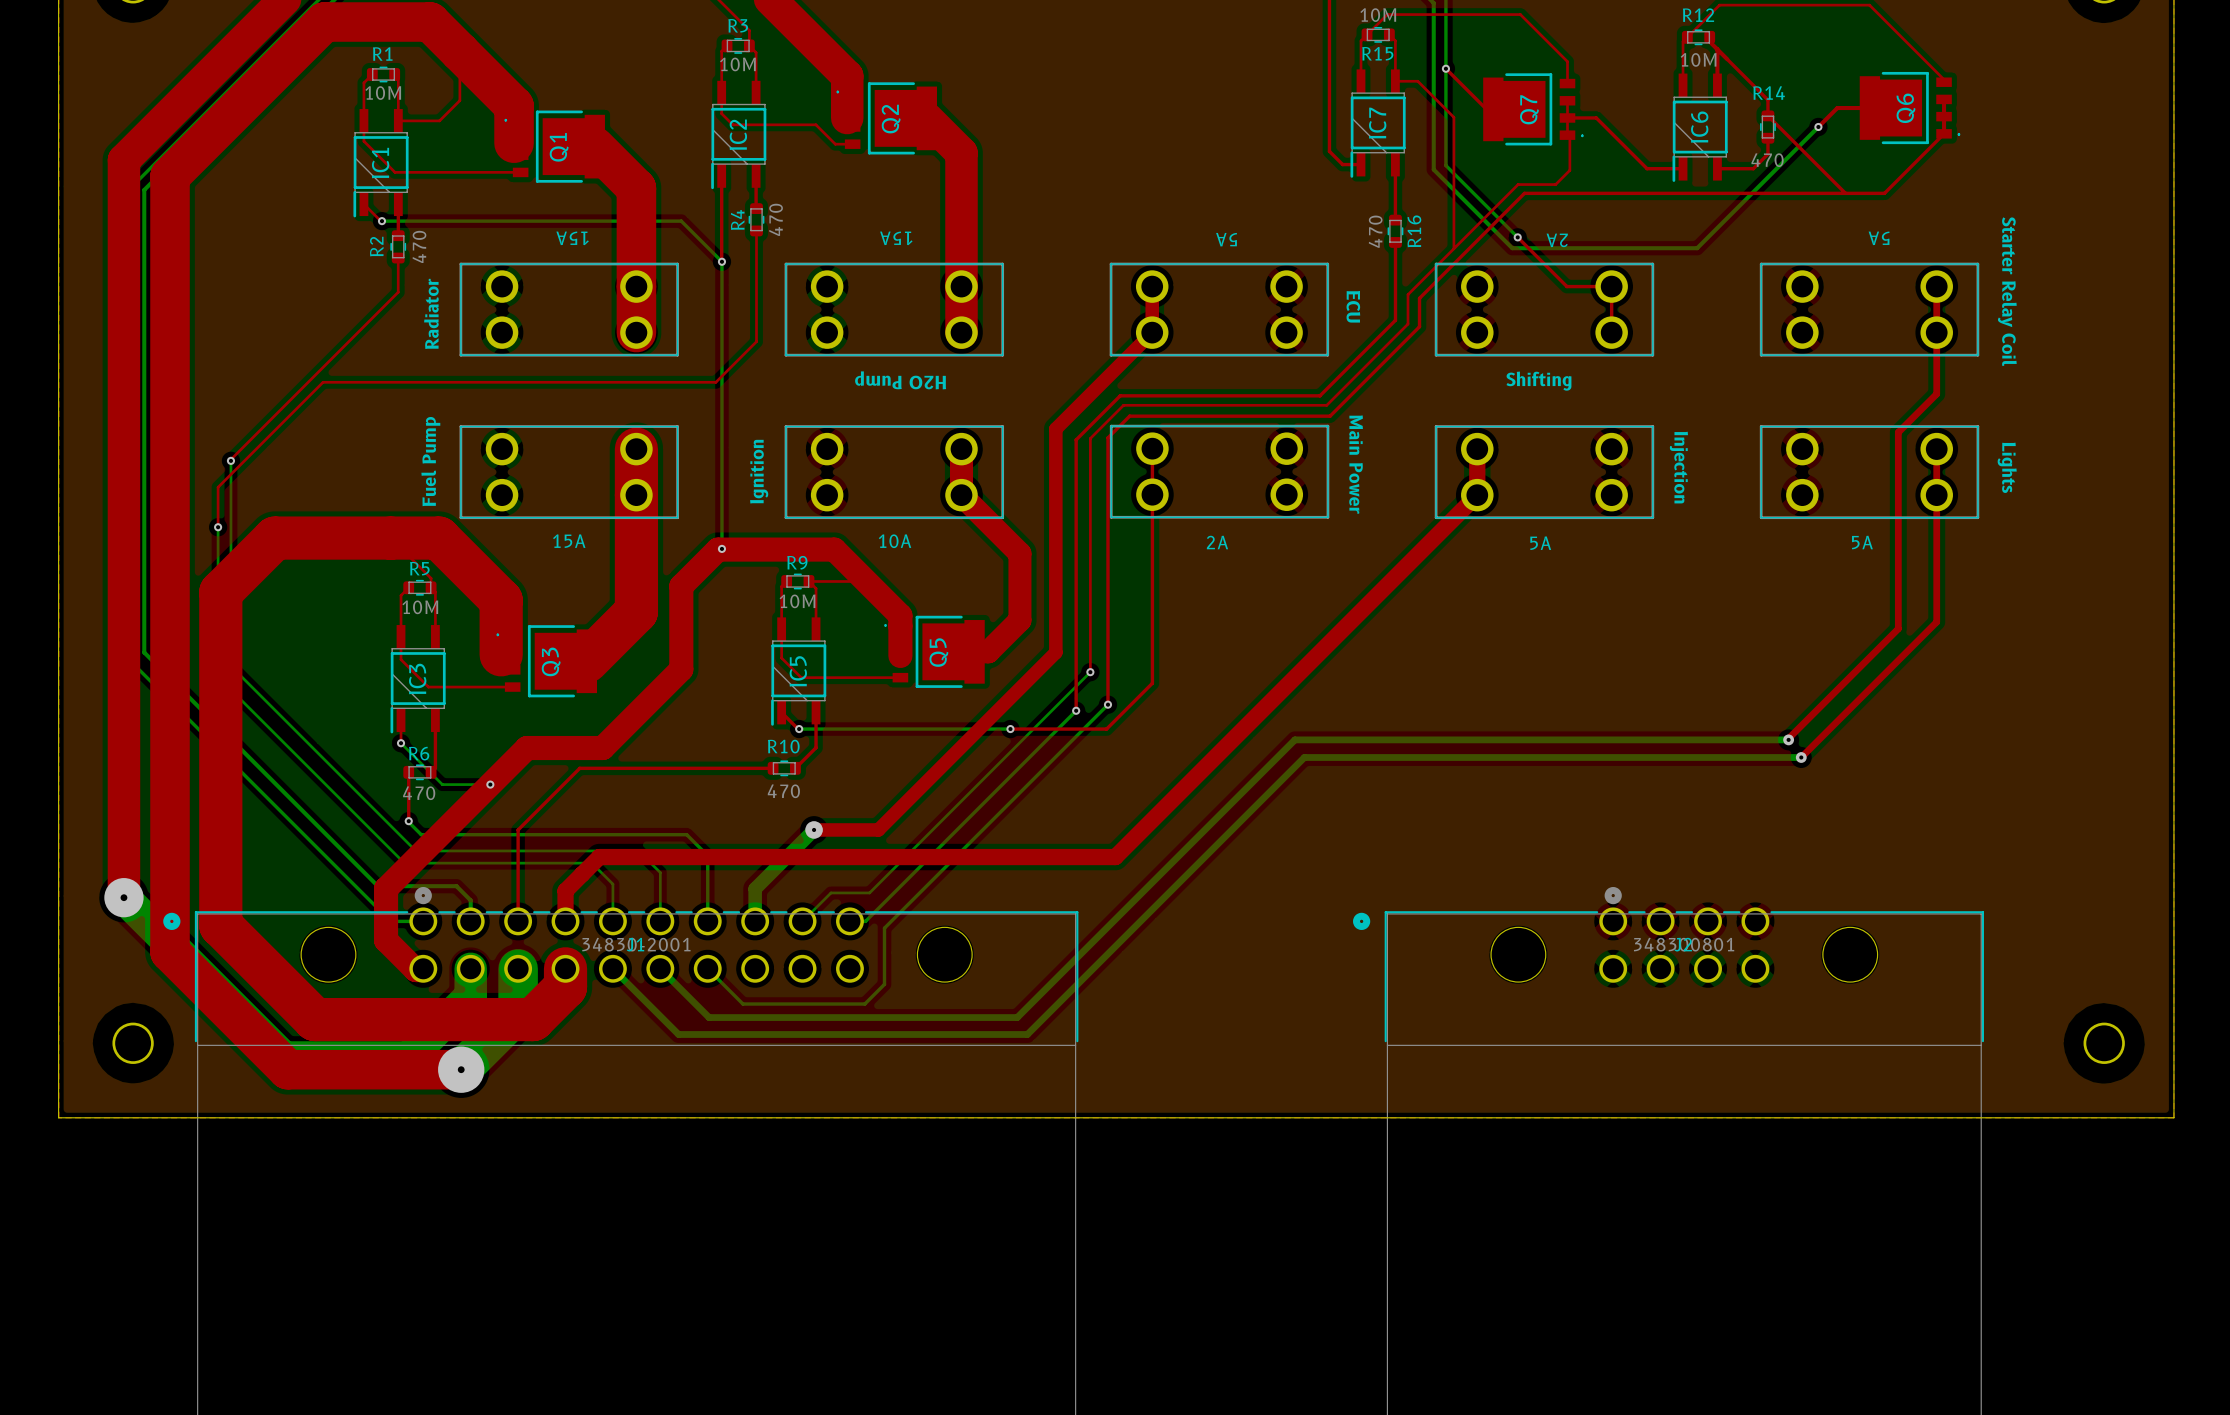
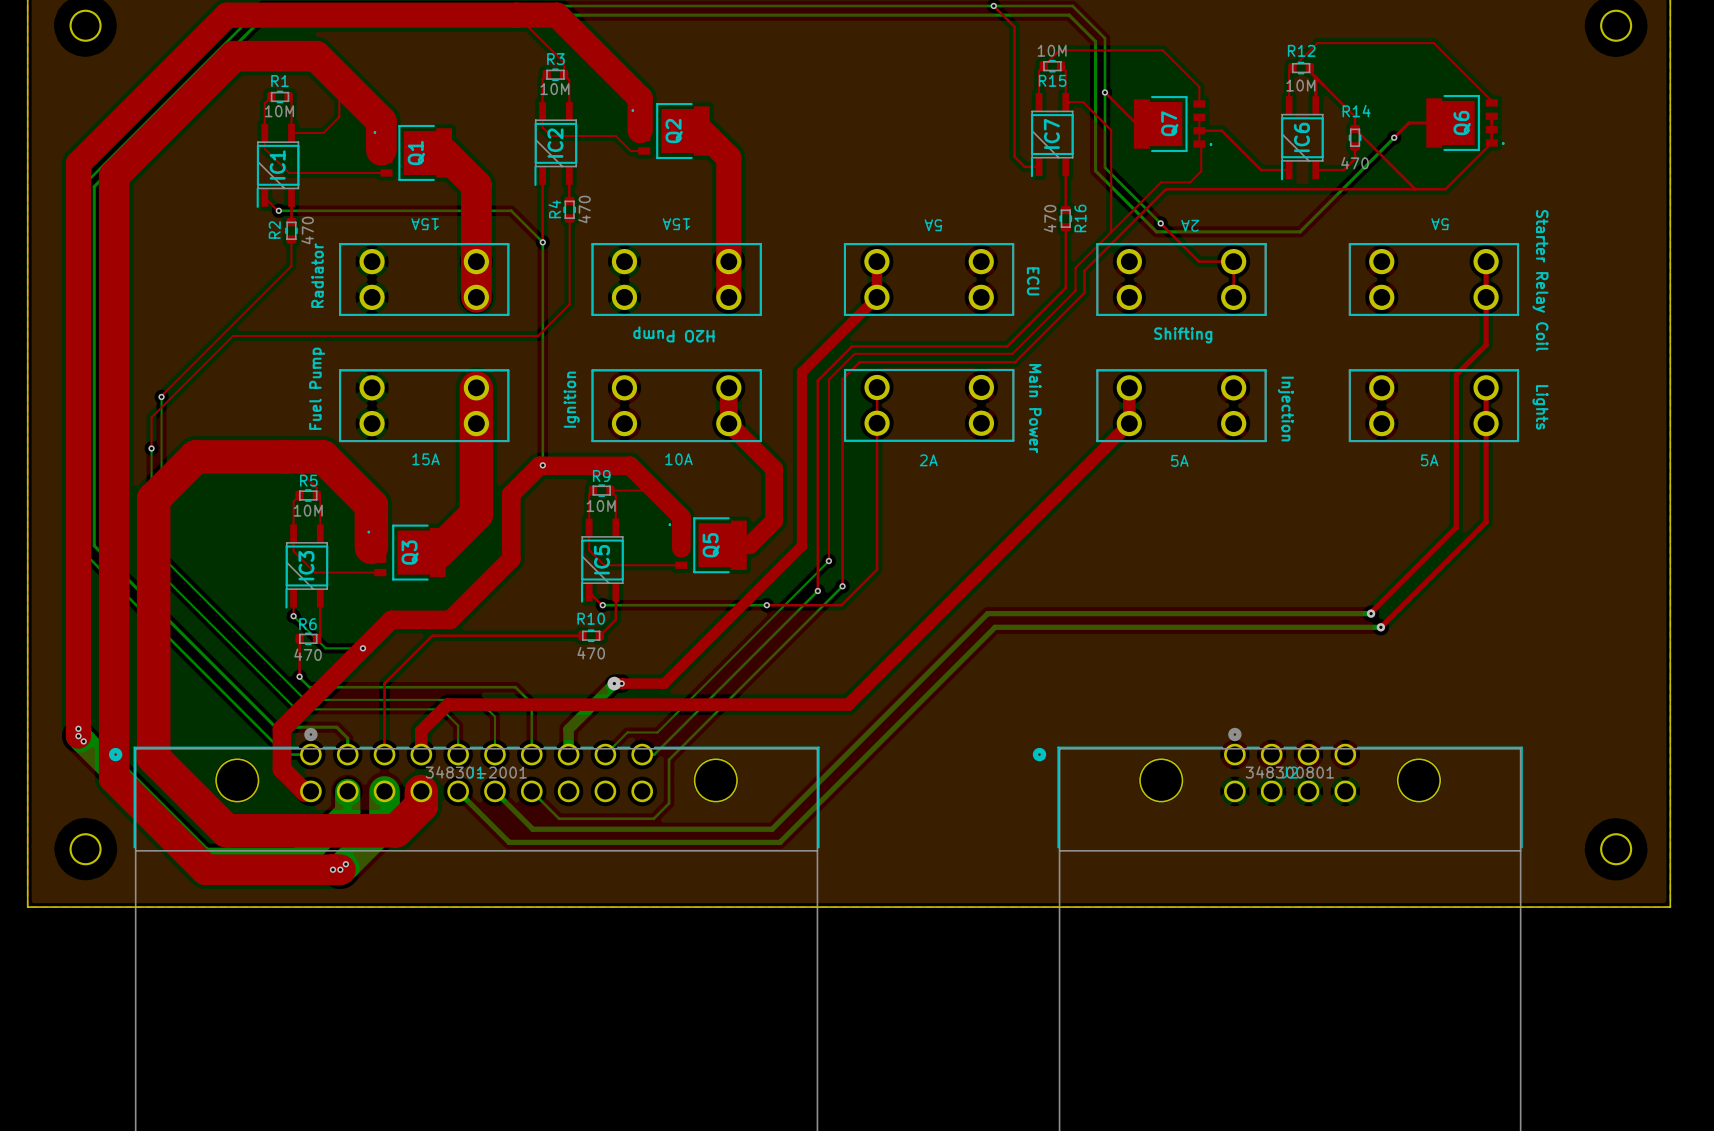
via: none -> (621, 683)
via size: [104, 878, 144, 918] -> [75, 733, 82, 740]
via: none -> (78, 728)
via: none -> (83, 741)
via size: [438, 1046, 485, 1093] -> [337, 866, 344, 873]
via: none -> (345, 864)
via: none -> (332, 869)

